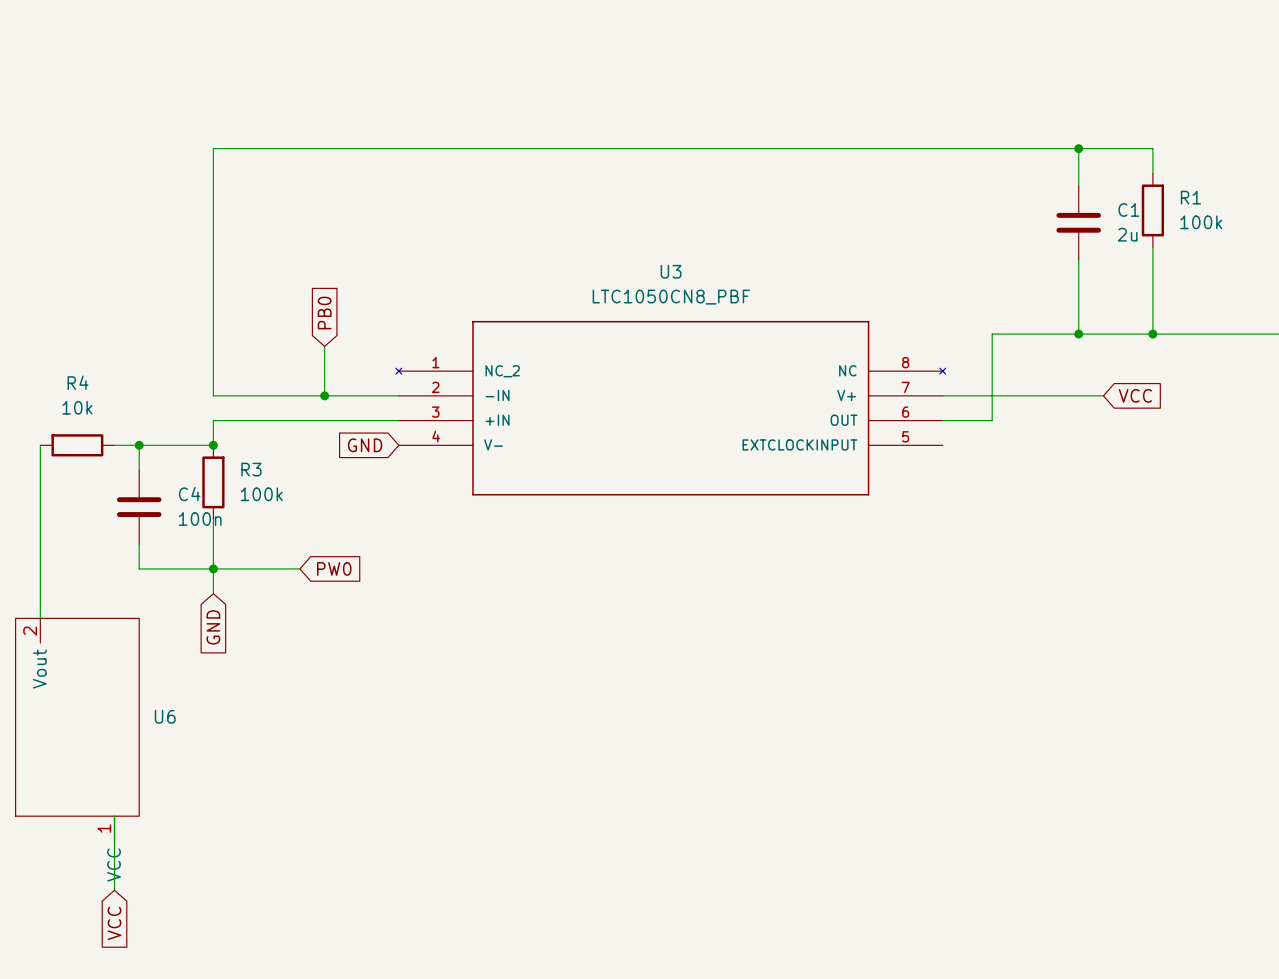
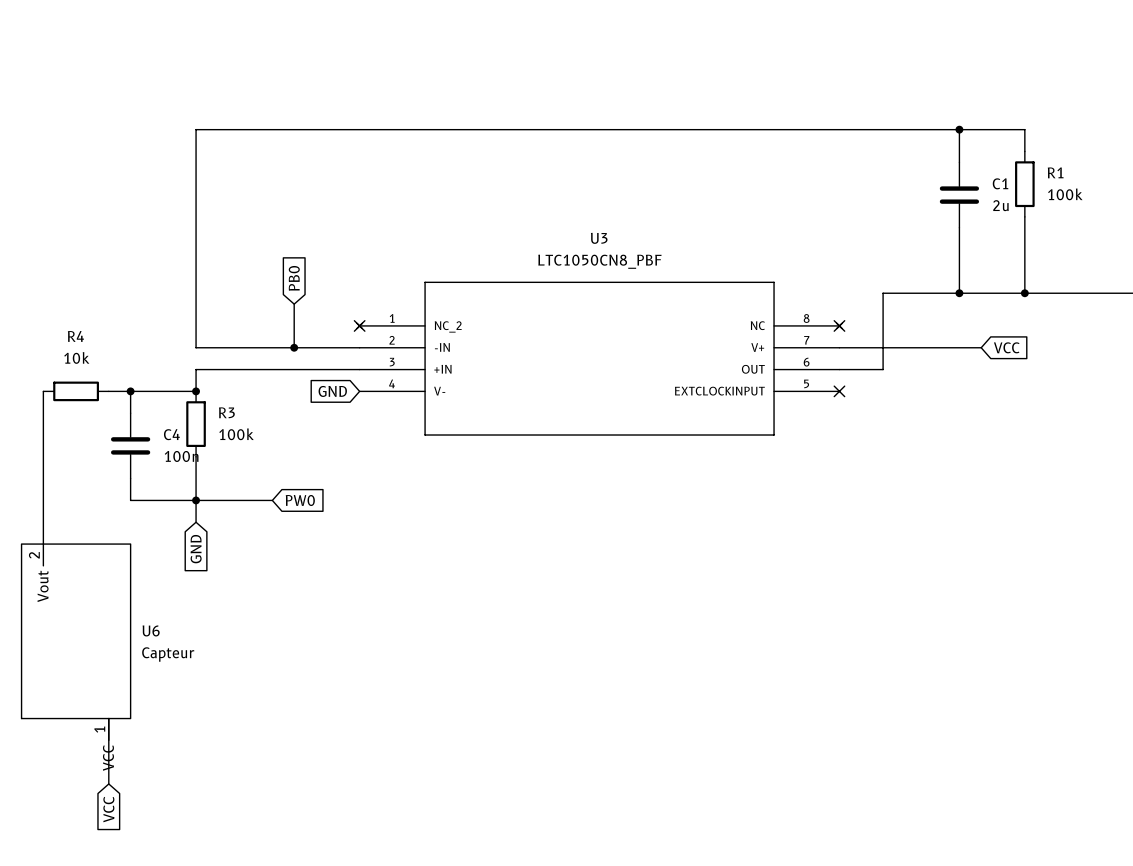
no-connect mark: none -> (359, 325)
no-connect mark: none -> (839, 325)
no-connect mark: none -> (839, 391)
U6 value: none -> Capteur (168, 654)

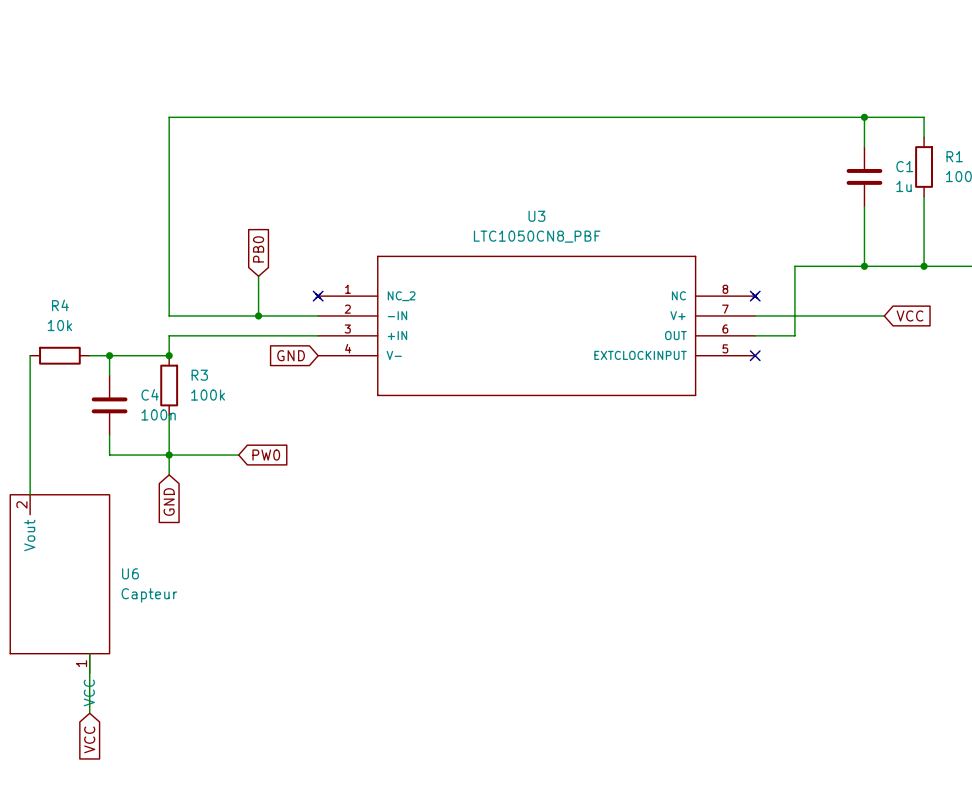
C1 value: 2u (1000, 205) -> 1u (904, 186)

